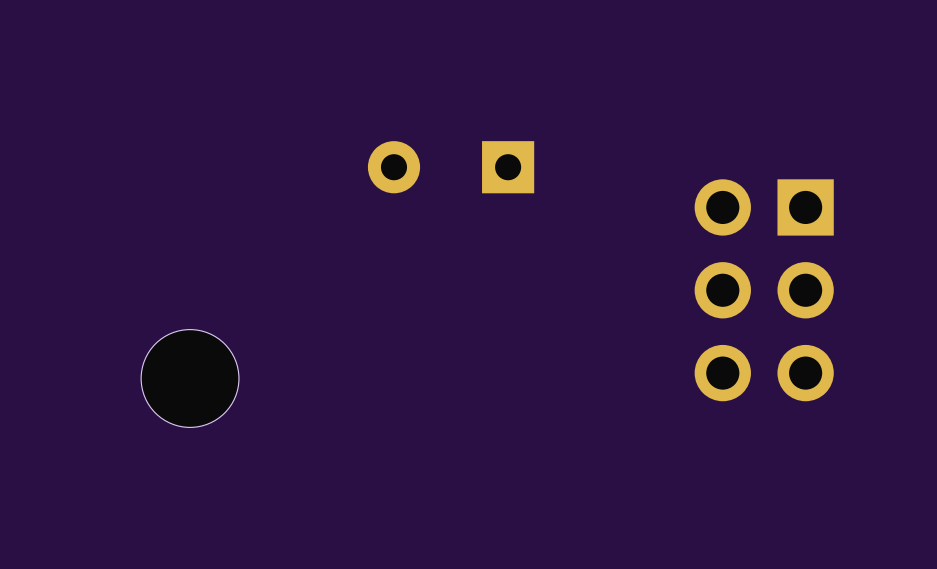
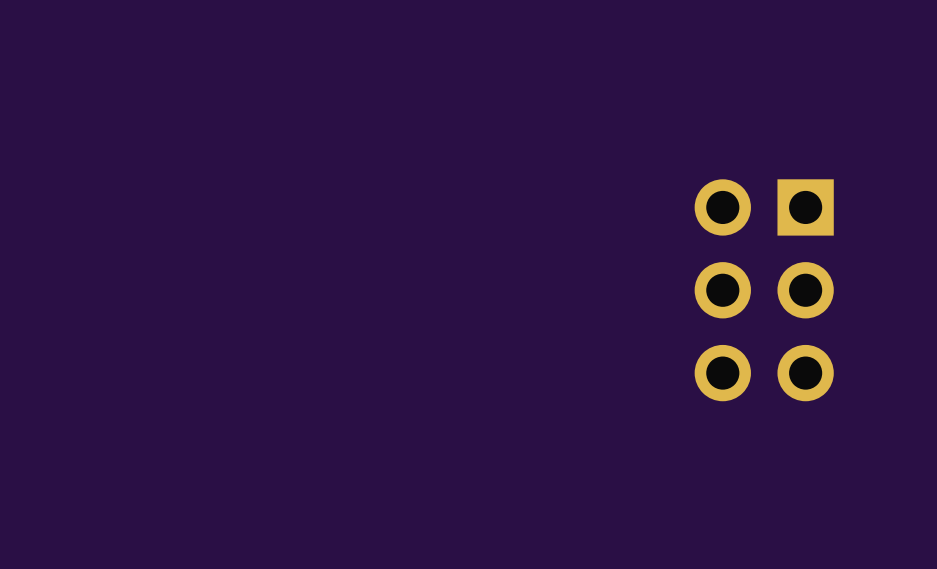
part: (451, 167) -> none
part: (190, 378) -> none

